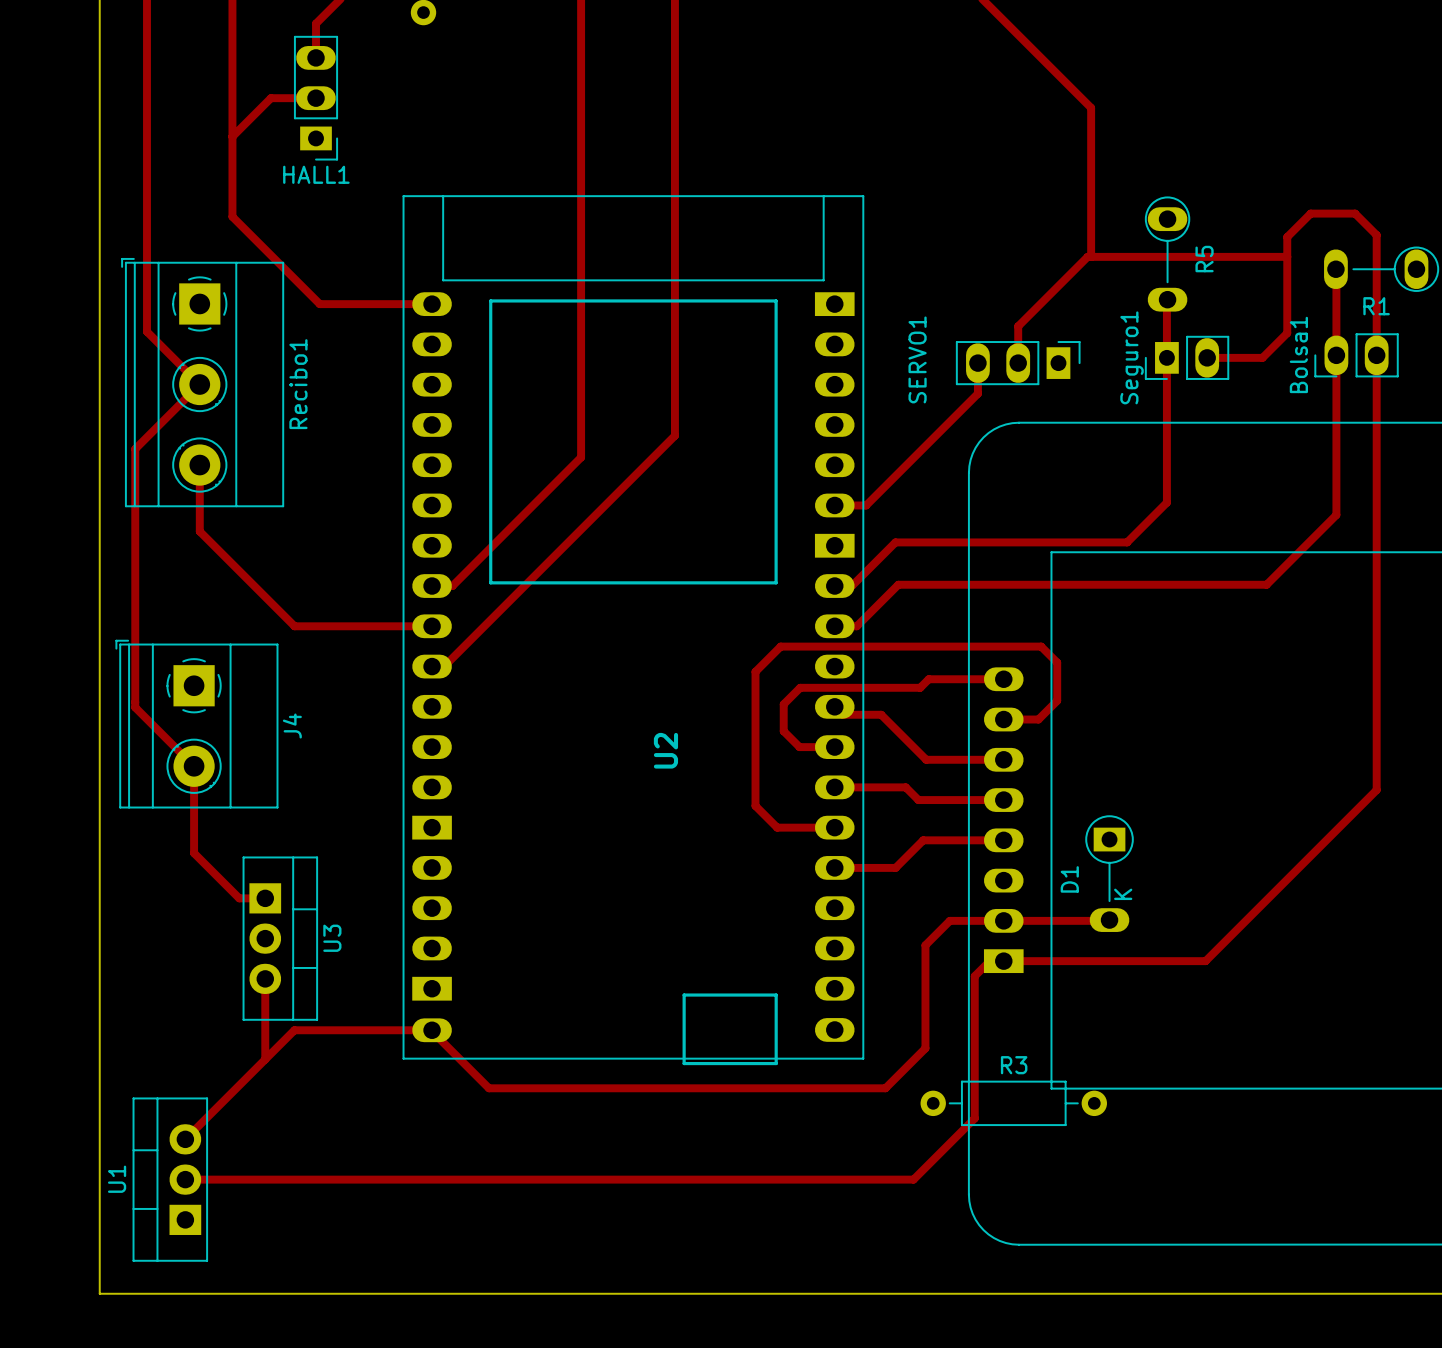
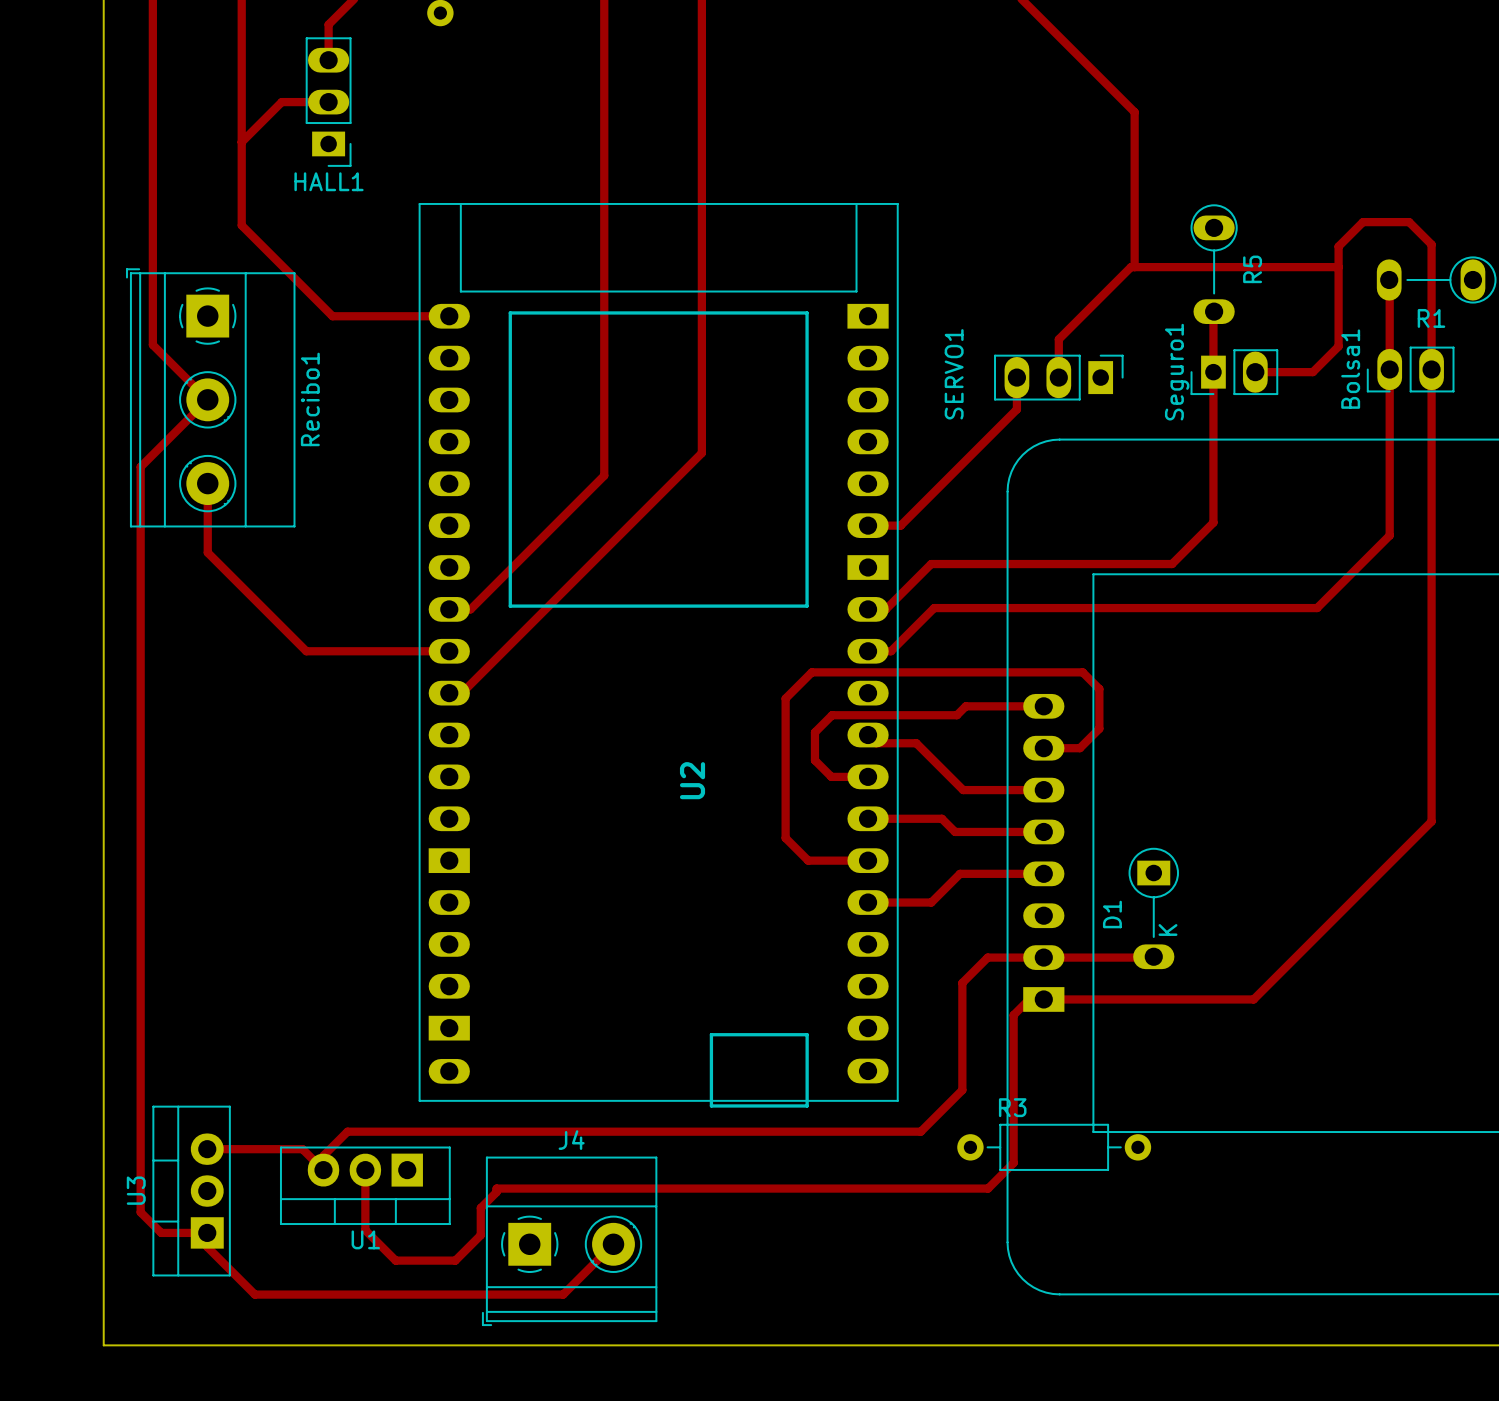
track: (135, 707) (194, 766) (194, 853) (239, 898) (265, 898) -> (140, 735) (140, 1212) (161, 1232) (207, 1232) (207, 1246) (254, 1294) (563, 1294) (613, 1244)
J4 rotation: 0° (196, 724) -> 90° counterclockwise (569, 1241)
J4 position: (196, 724) -> (569, 1241)
U3 rotation: 0° (280, 938) -> 180° (191, 1191)
U3 position: (280, 938) -> (191, 1191)
track: (265, 978) (265, 1059) -> none
R3 name position: R3 (1014, 1065) -> R3 (1012, 1107)
track: (488, 1088) (432, 1030) (294, 1030) (185, 1139) -> (508, 1131) (347, 1131) (323, 1155) (323, 1170) (302, 1149) (207, 1149)
track: (950, 1142) (913, 1179) (185, 1179) -> (988, 1188) (496, 1188) (496, 1192) (480, 1208) (480, 1235) (455, 1260) (395, 1260) (365, 1230) (365, 1170)
U1 rotation: 0° (170, 1179) -> 90° counterclockwise (365, 1185)
U1 position: (170, 1179) -> (365, 1185)

